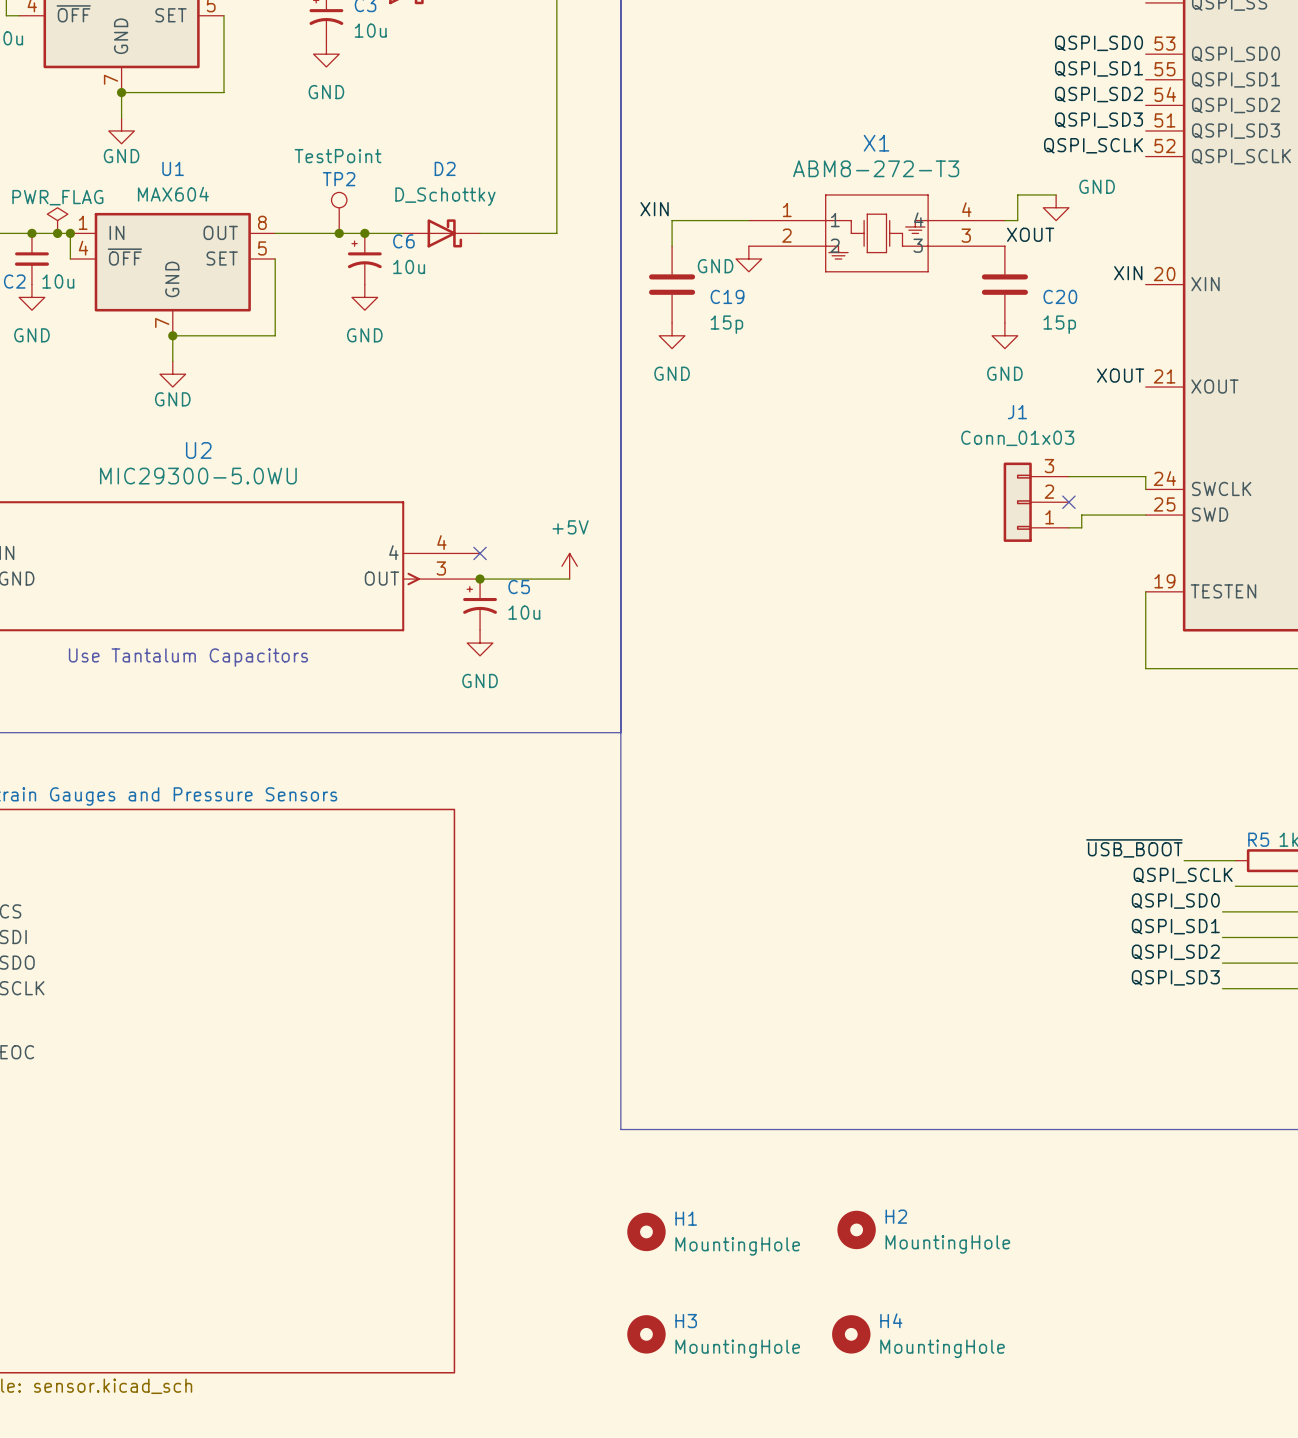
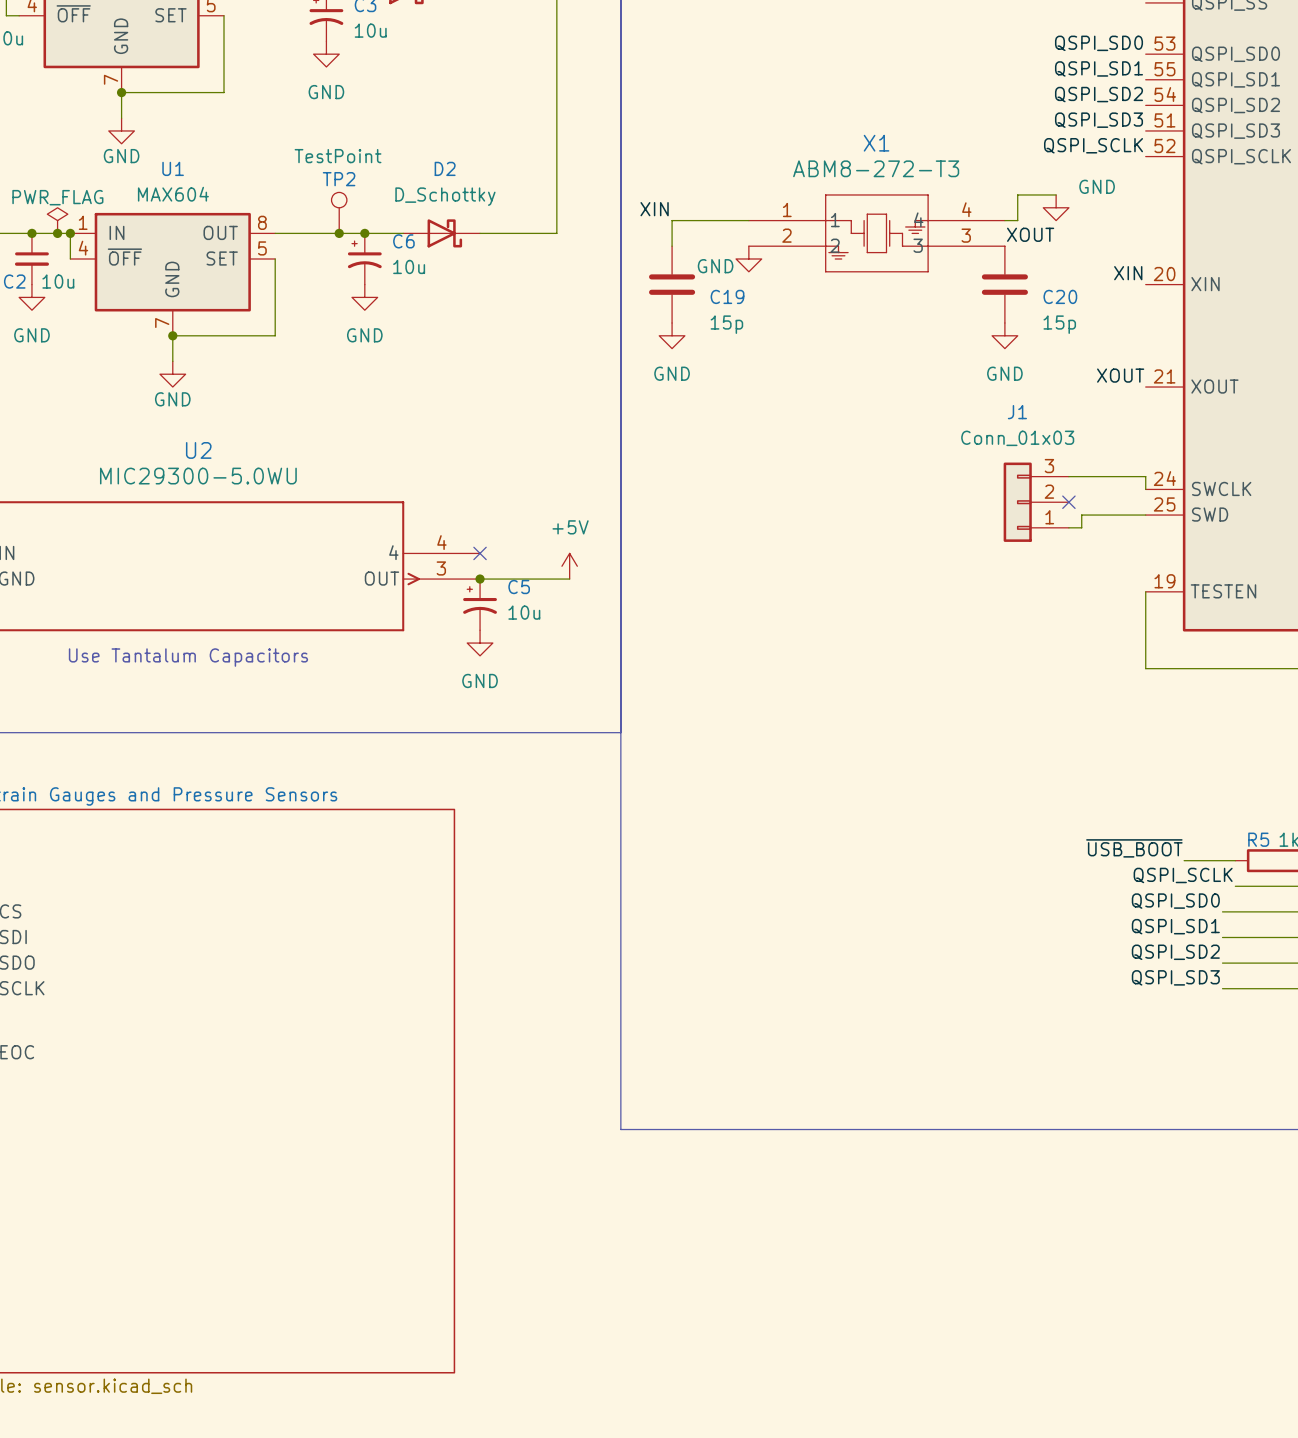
H2: MountingHole (856, 1229) -> none
H1: MountingHole (646, 1231) -> none
H3: MountingHole (646, 1334) -> none
H4: MountingHole (851, 1334) -> none

